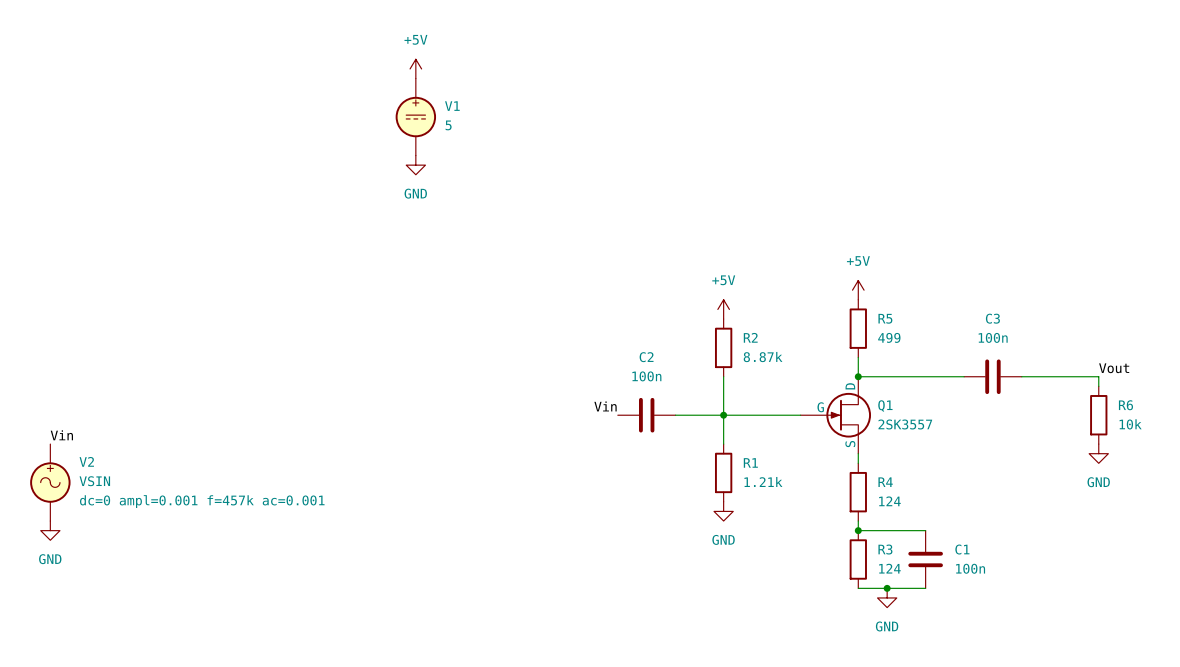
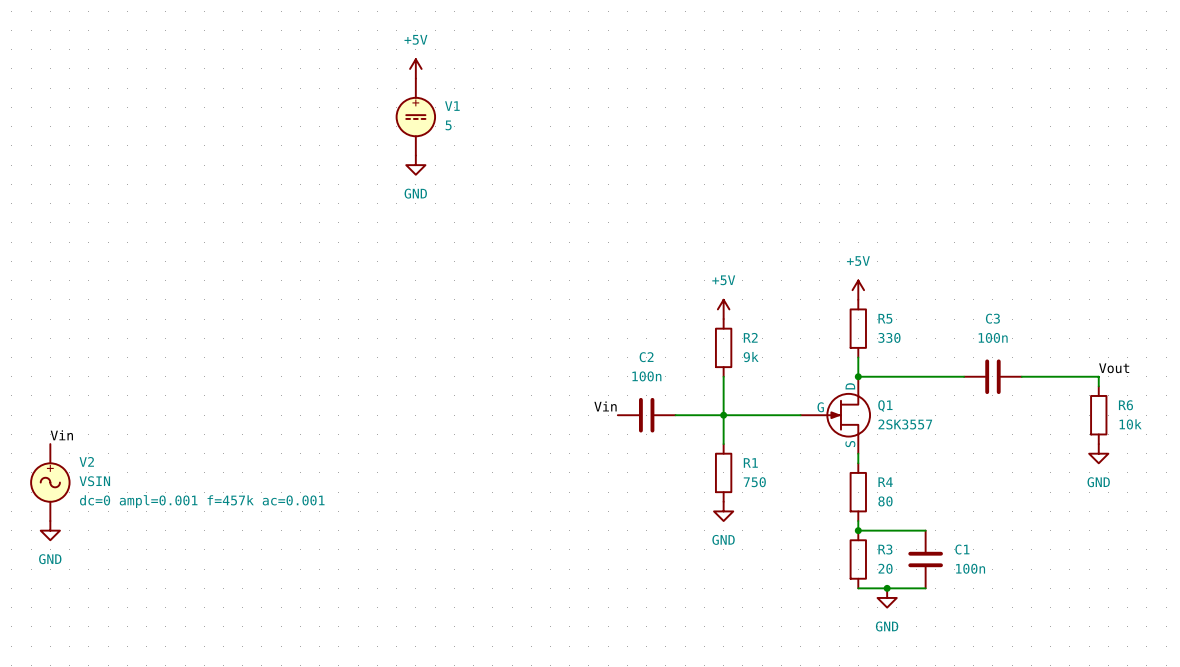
R5 value: 499 (889, 337) -> 330 (889, 337)
R2 value: 8.87k (763, 357) -> 9k (751, 357)
R1 value: 1.21k (763, 481) -> 750 (754, 482)
R4 value: 124 (889, 501) -> 80 (885, 501)
R3 value: 124 (889, 568) -> 20 (885, 568)

